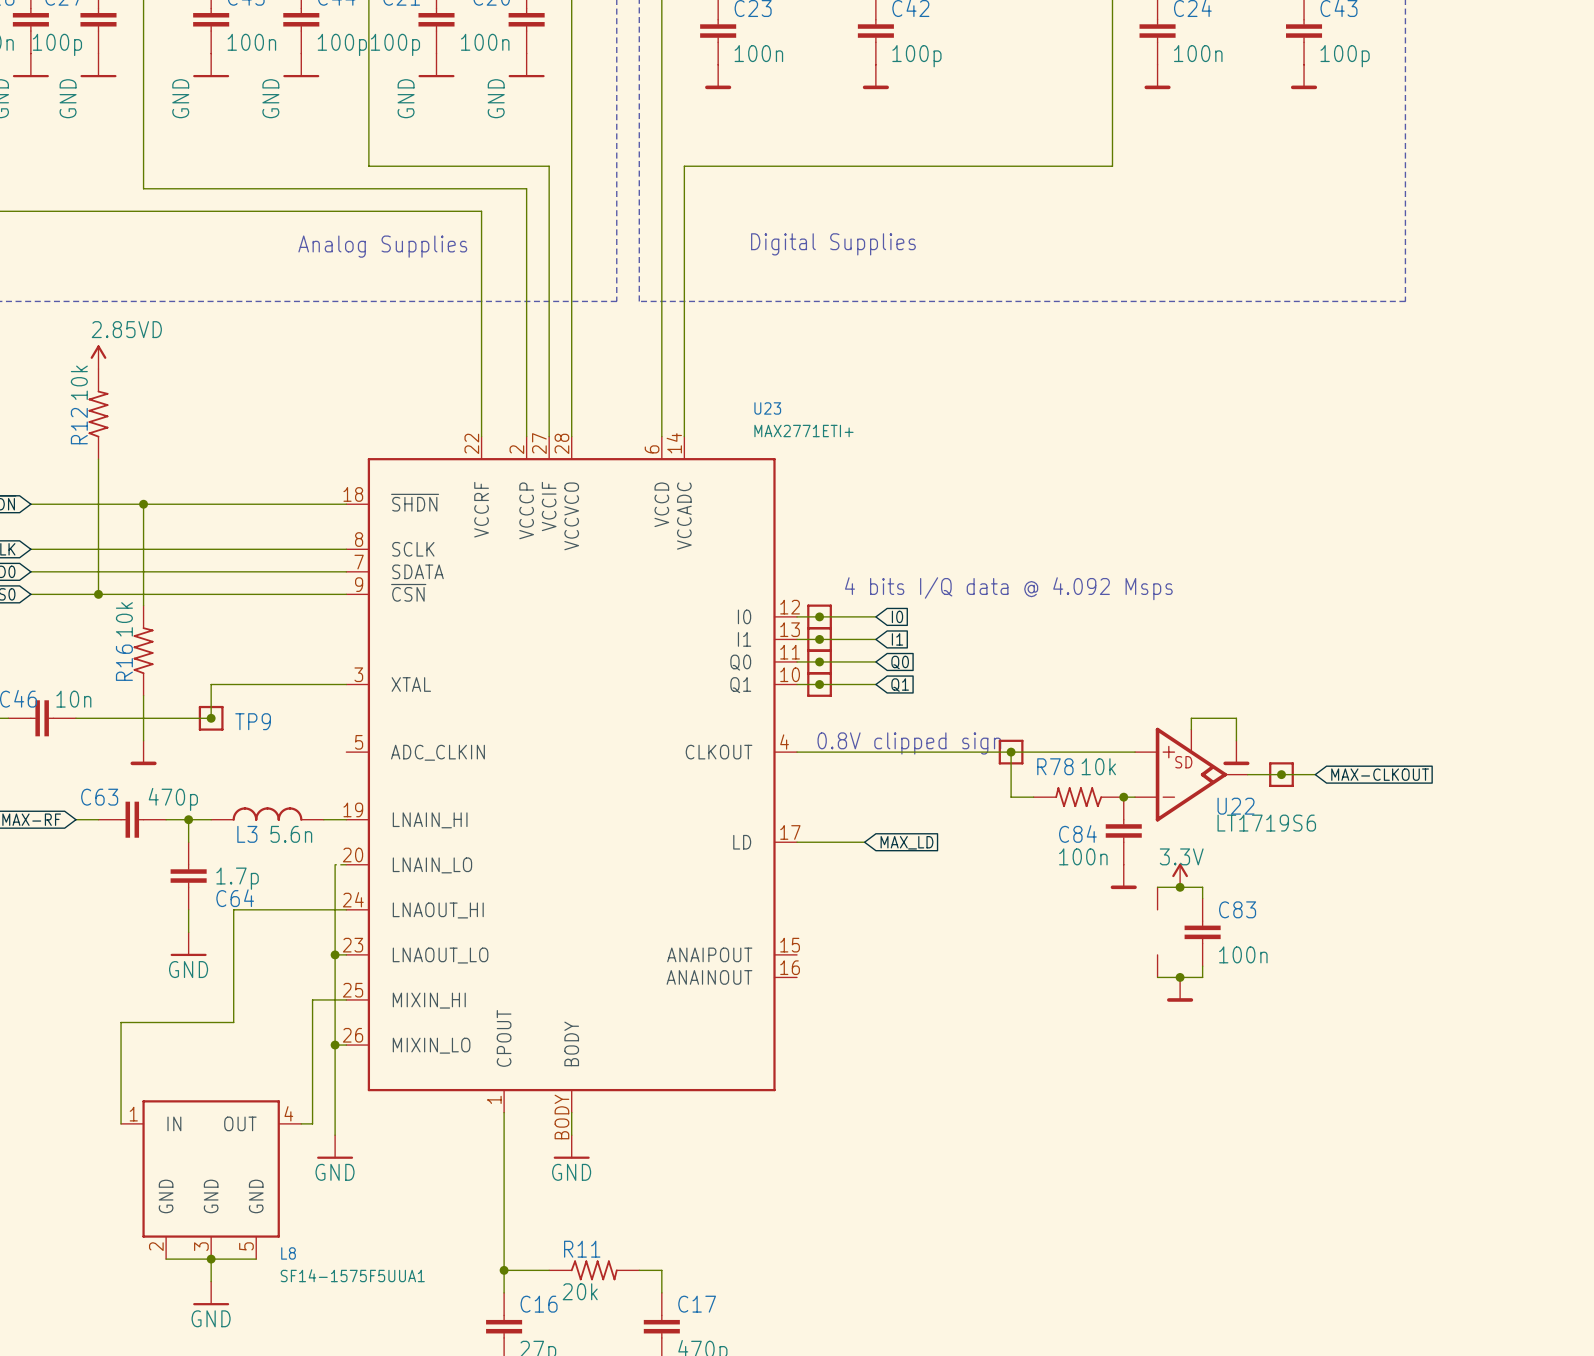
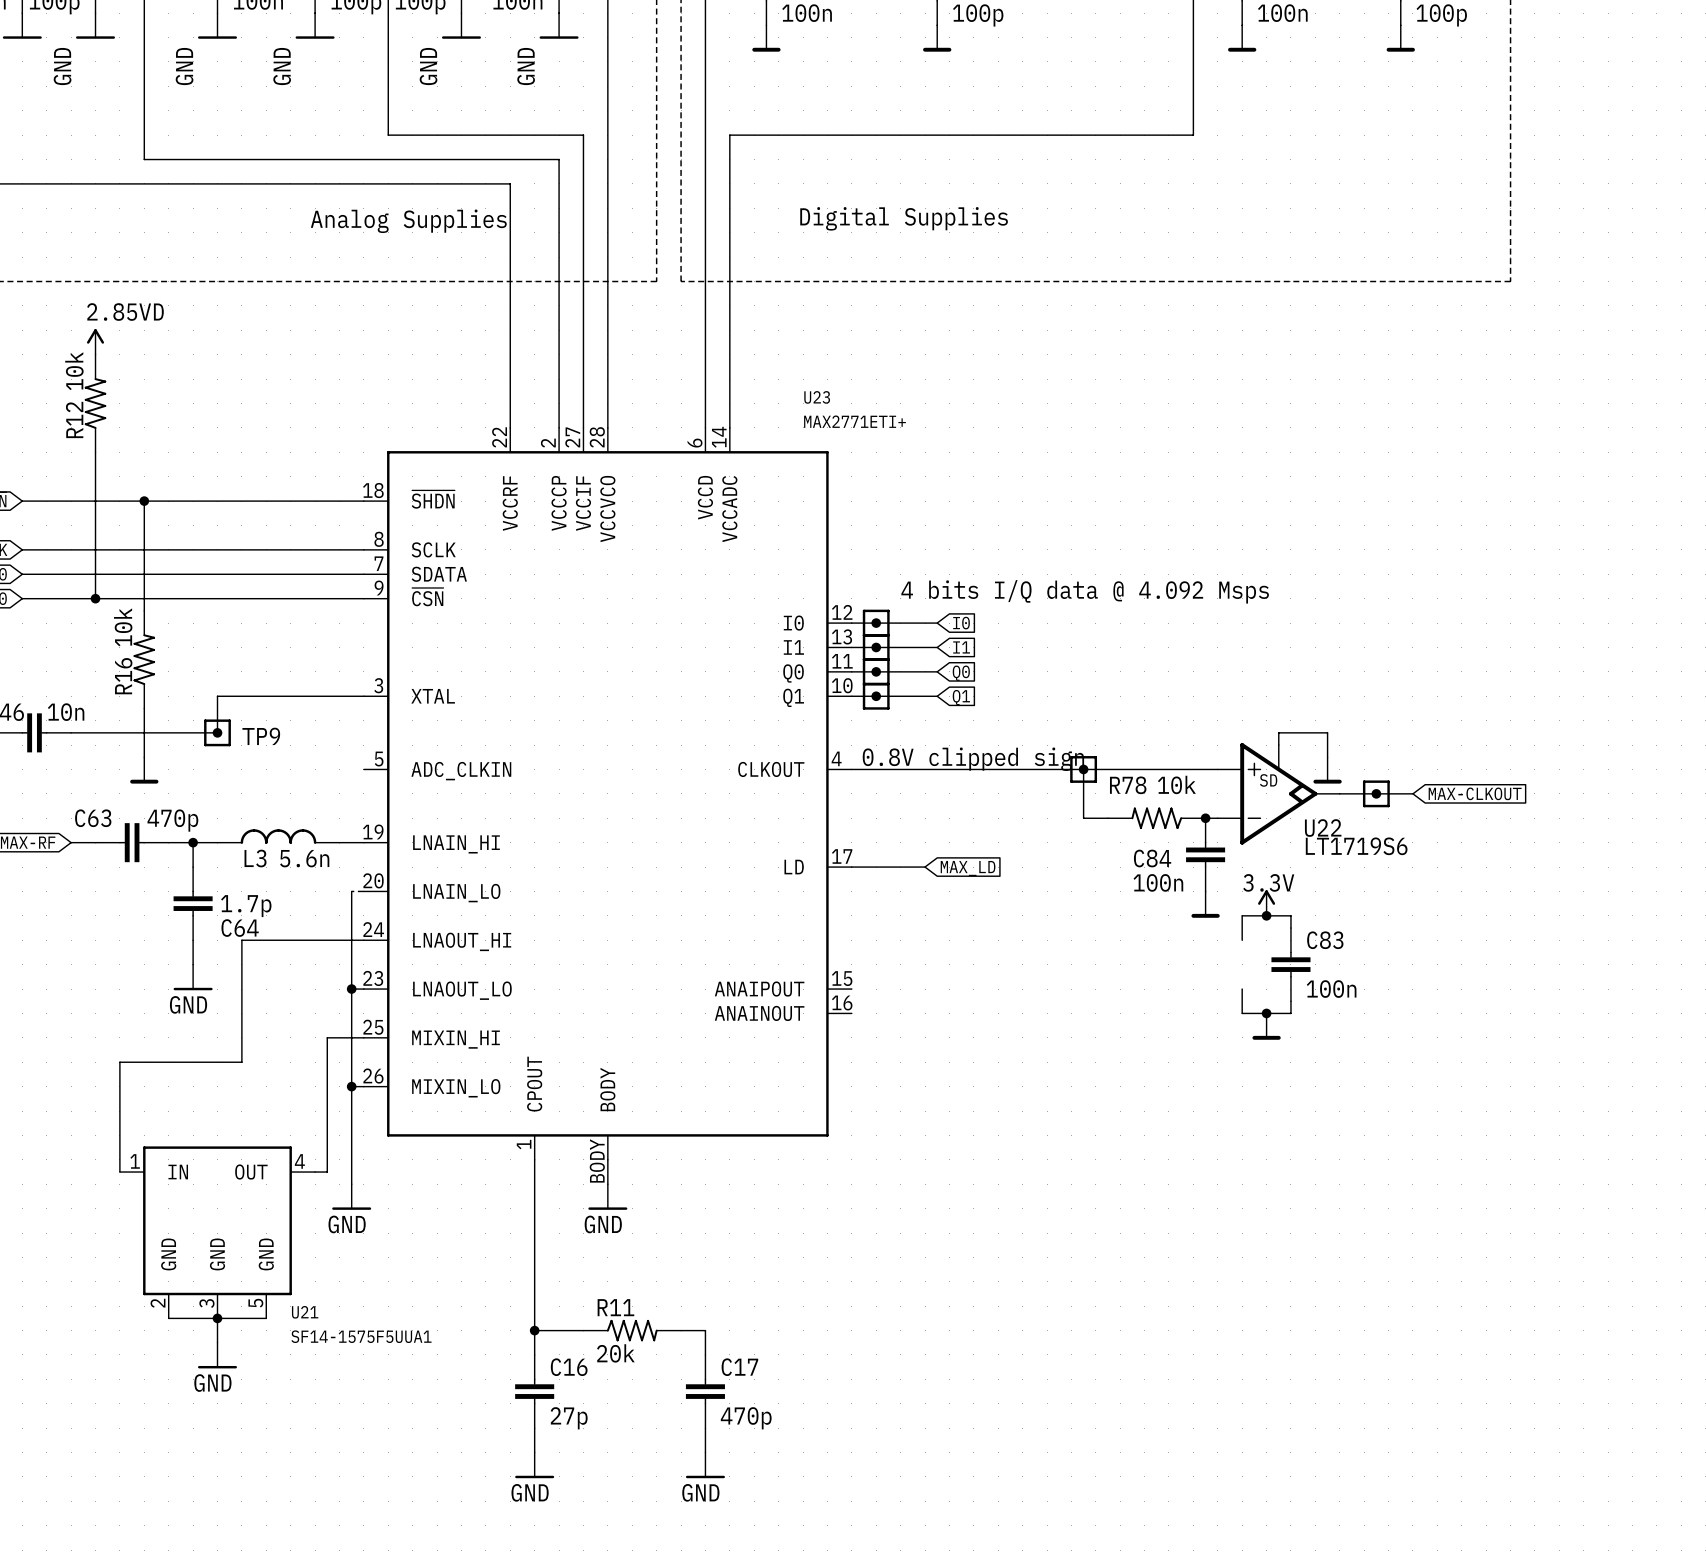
L8 name: L8 (288, 1253) -> U21 (305, 1312)

